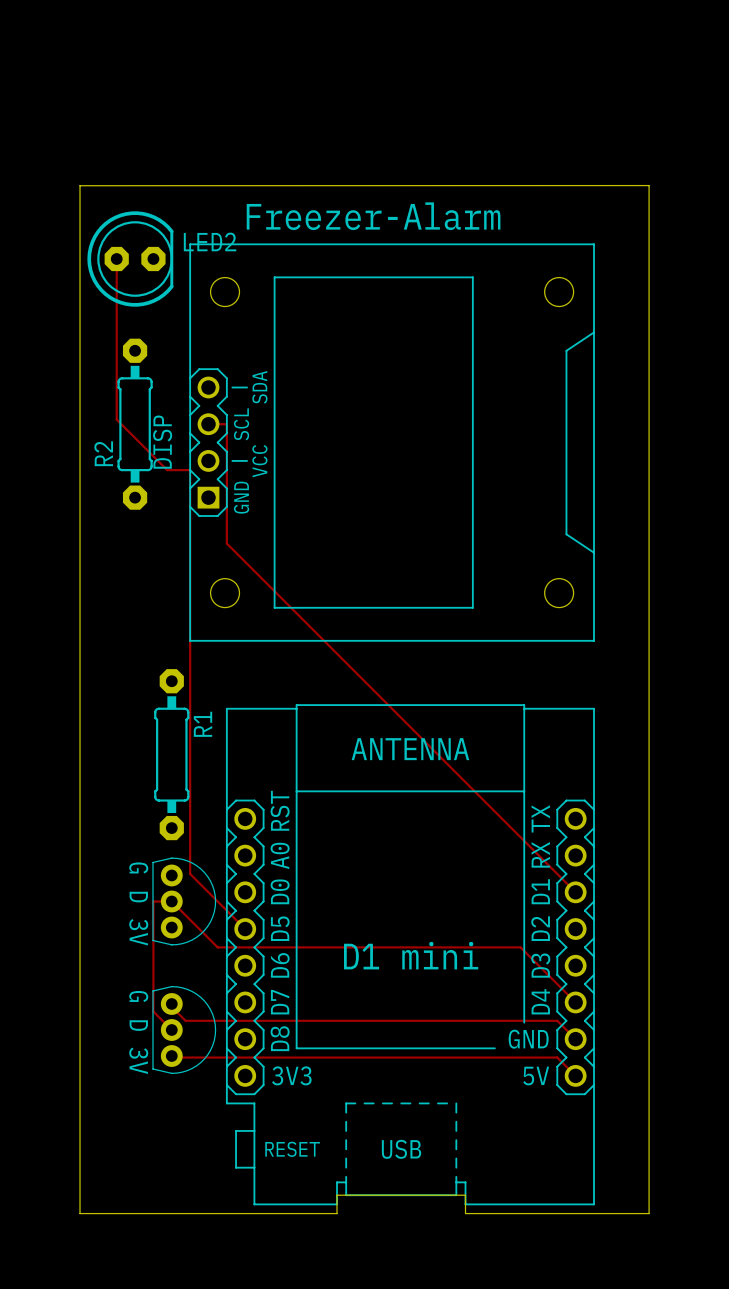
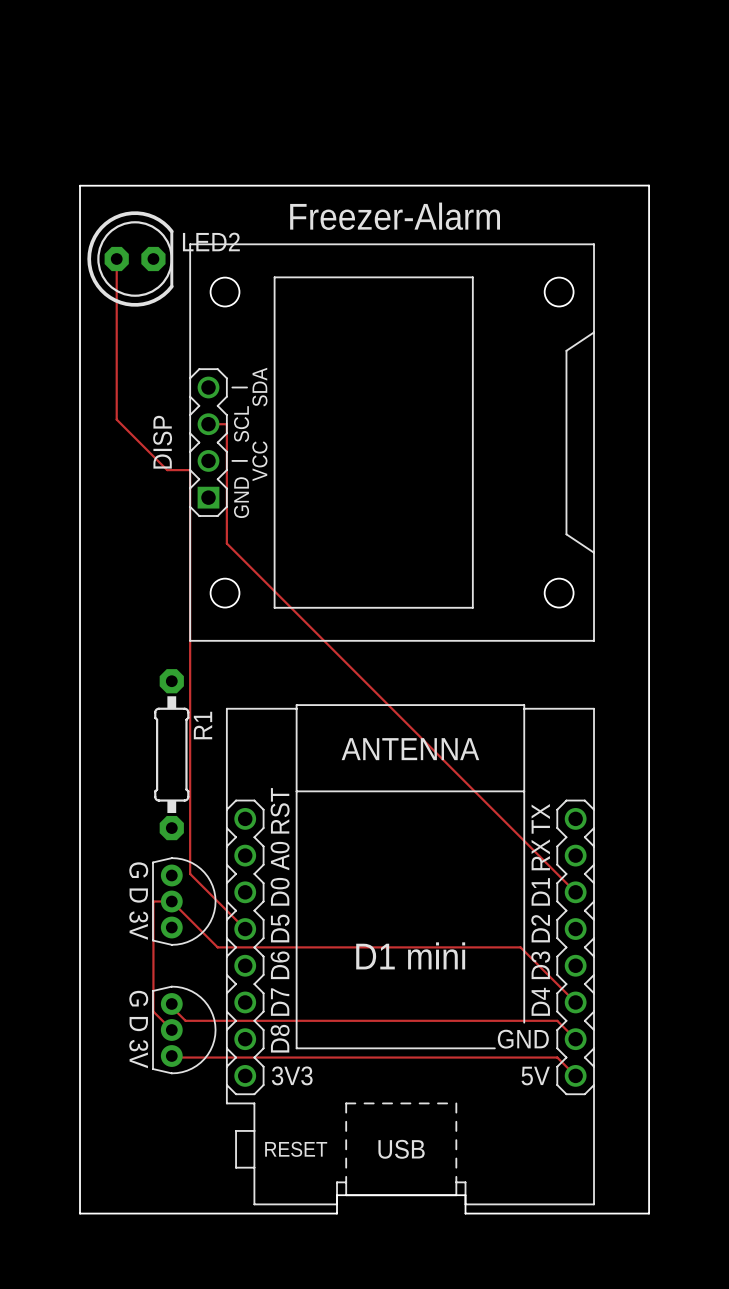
R2: (135, 424) -> none

